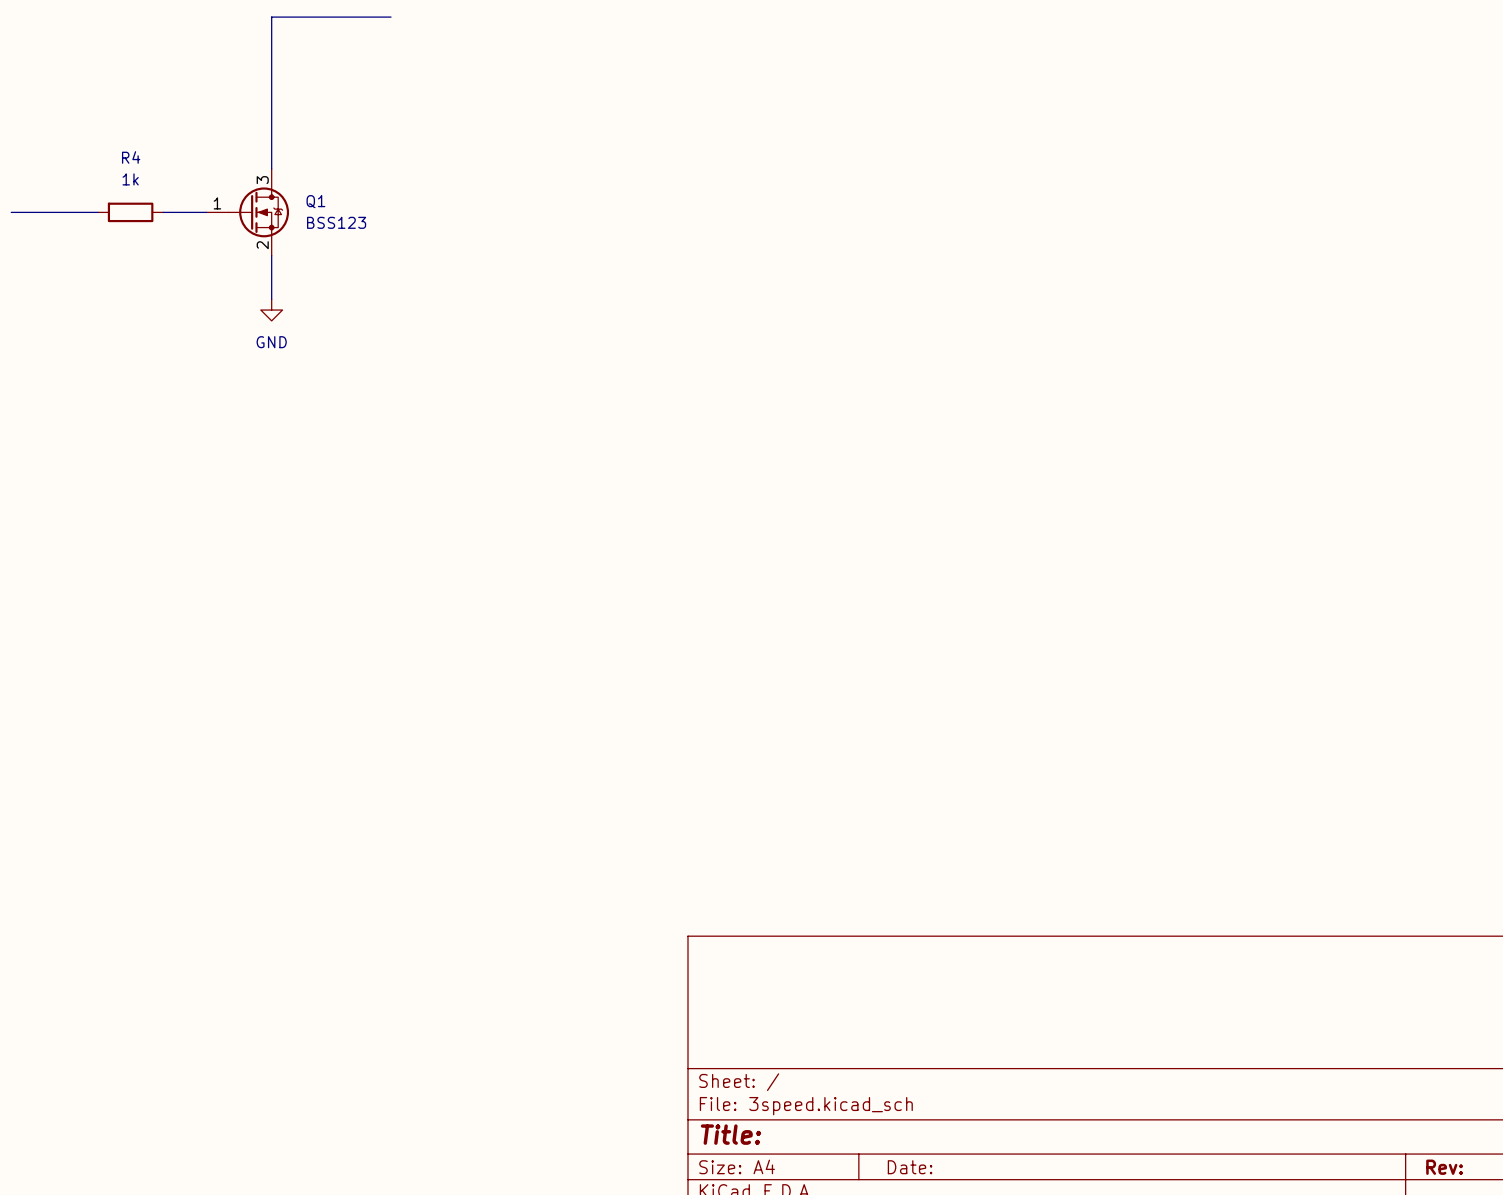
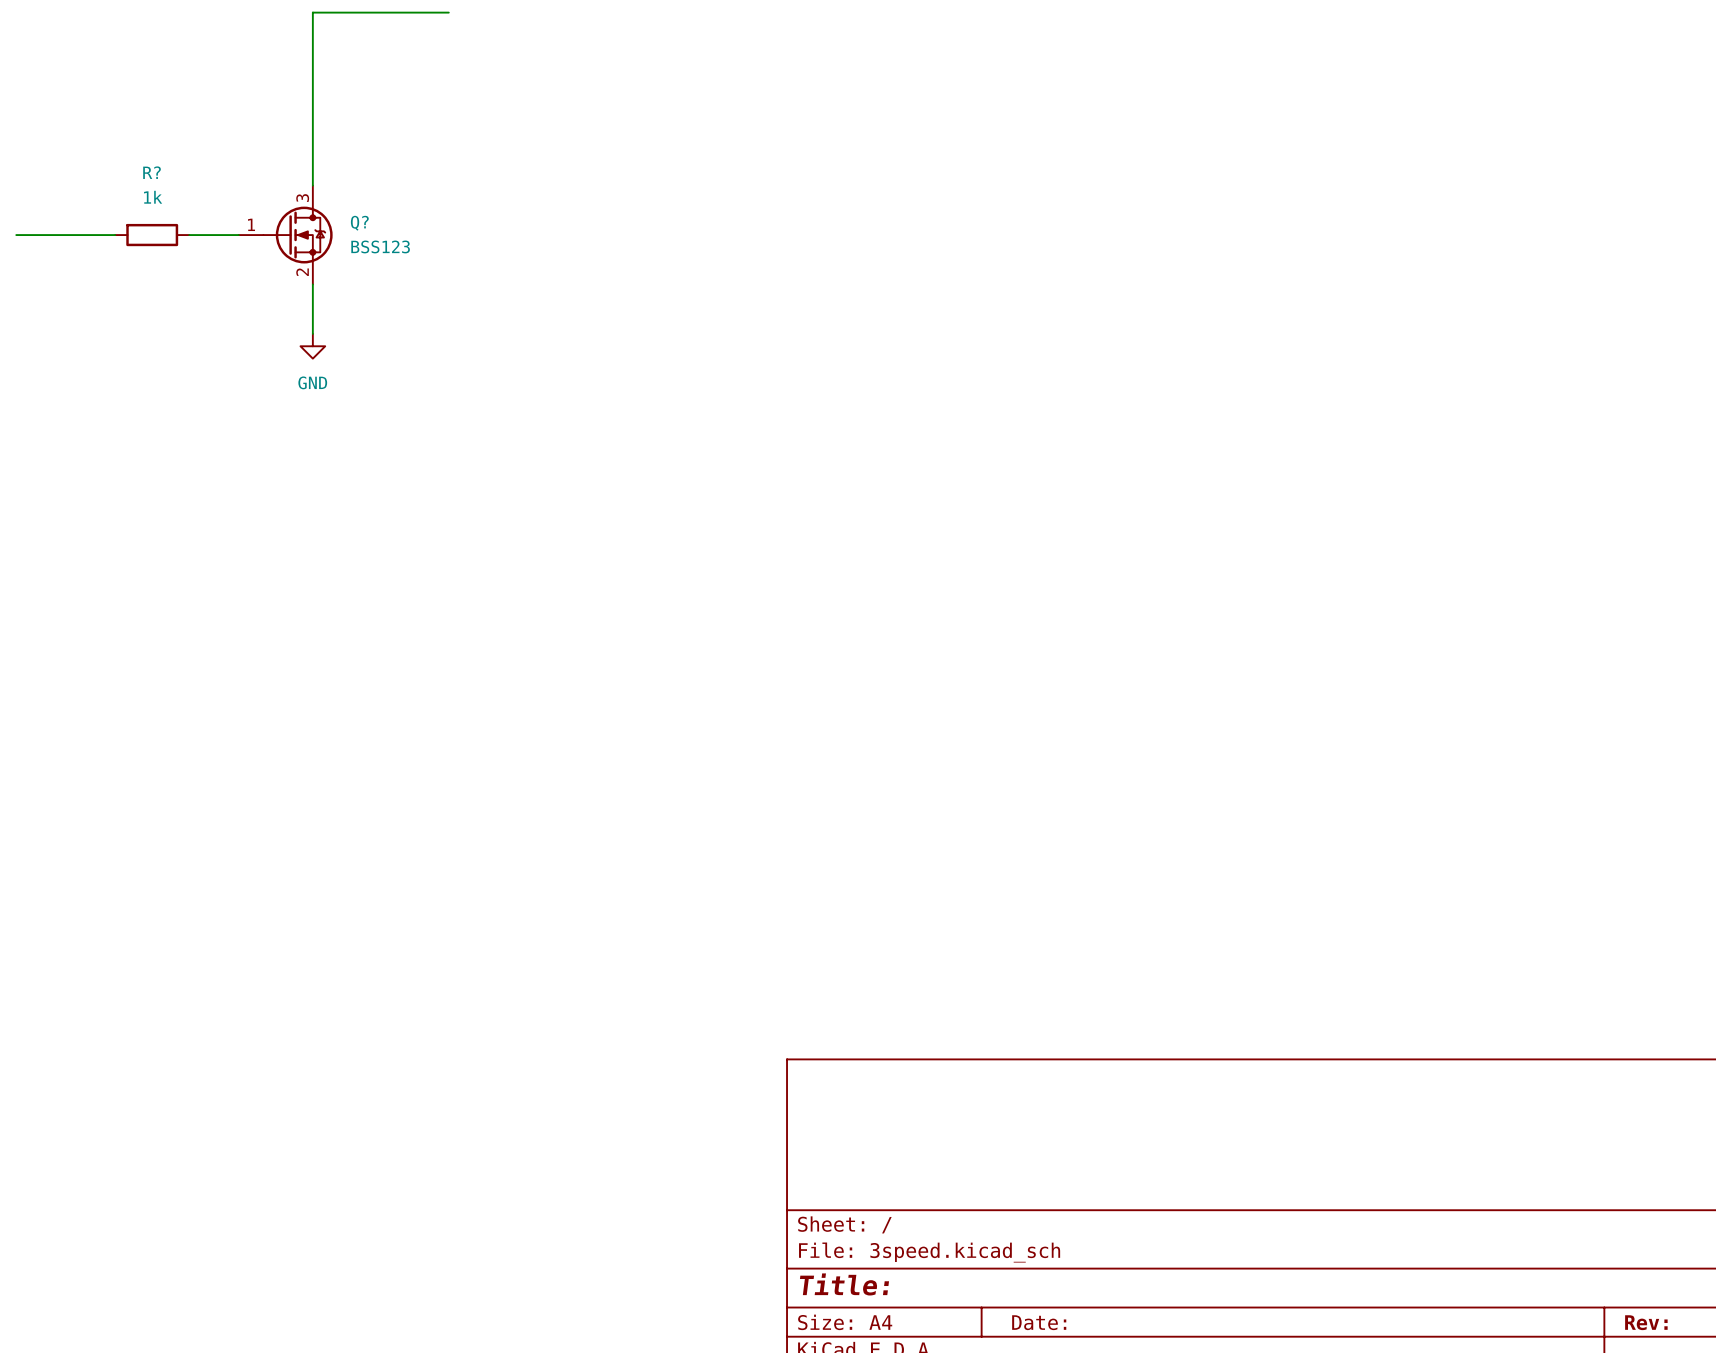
R4 name: R4 (131, 157) -> R? (152, 172)
Q1 name: Q1 (315, 201) -> Q? (359, 223)

